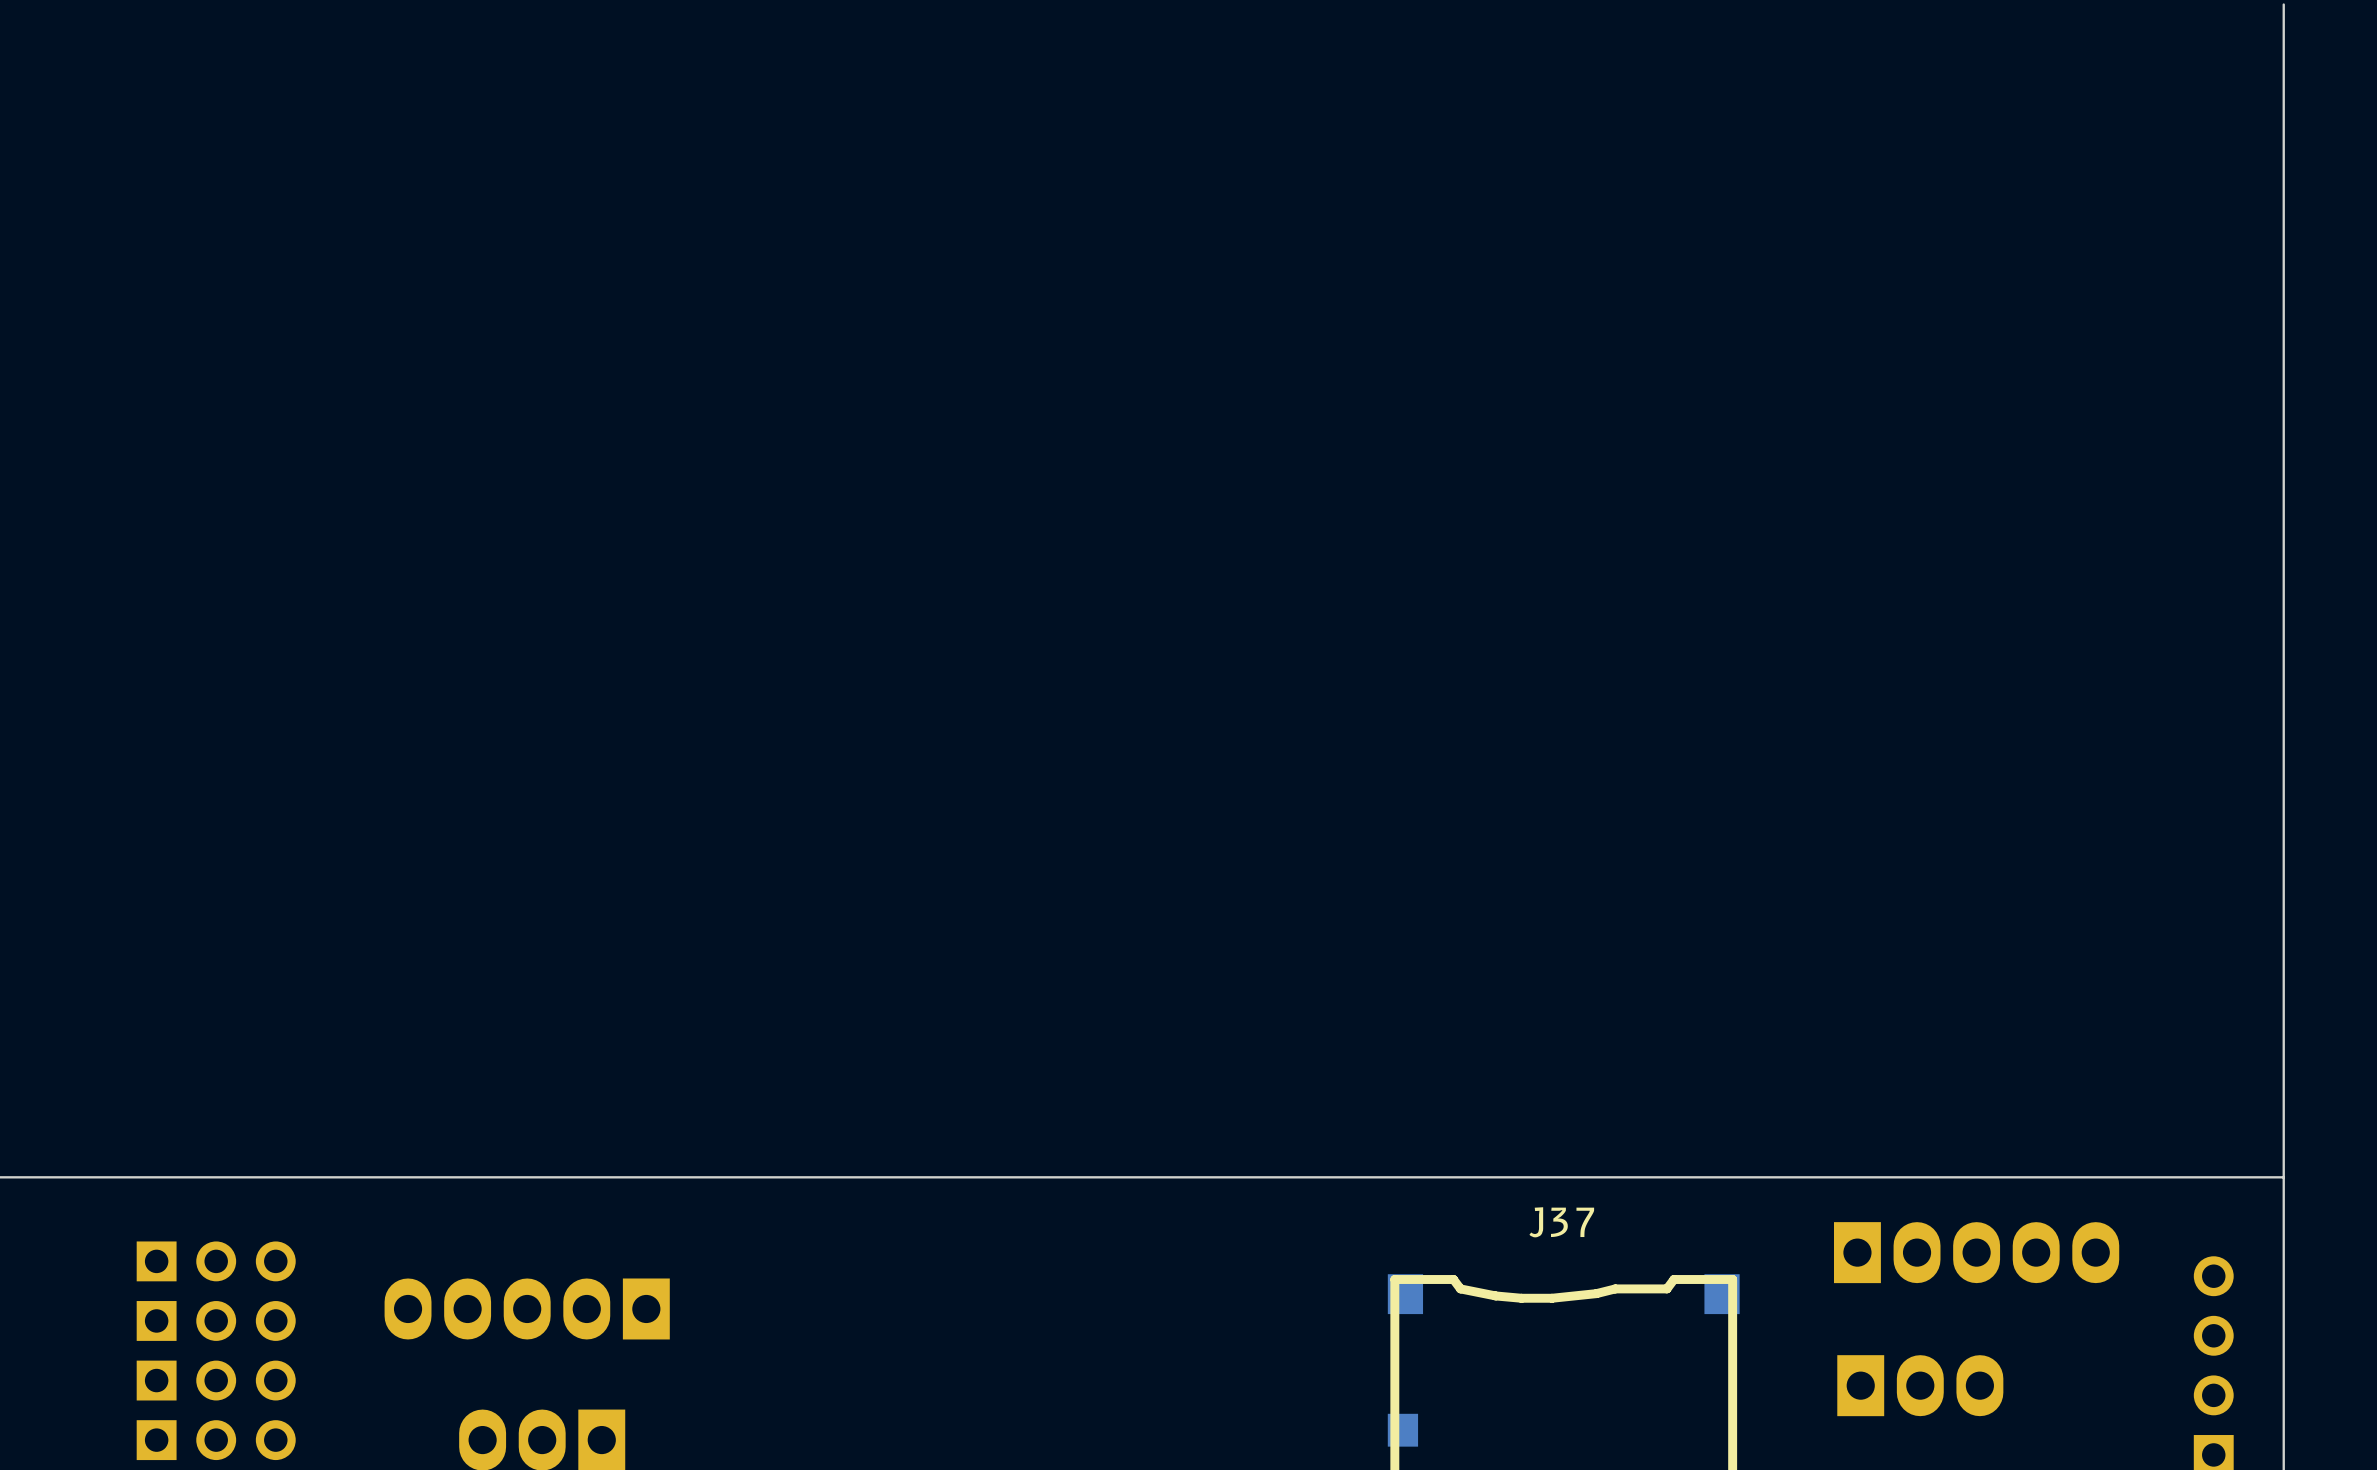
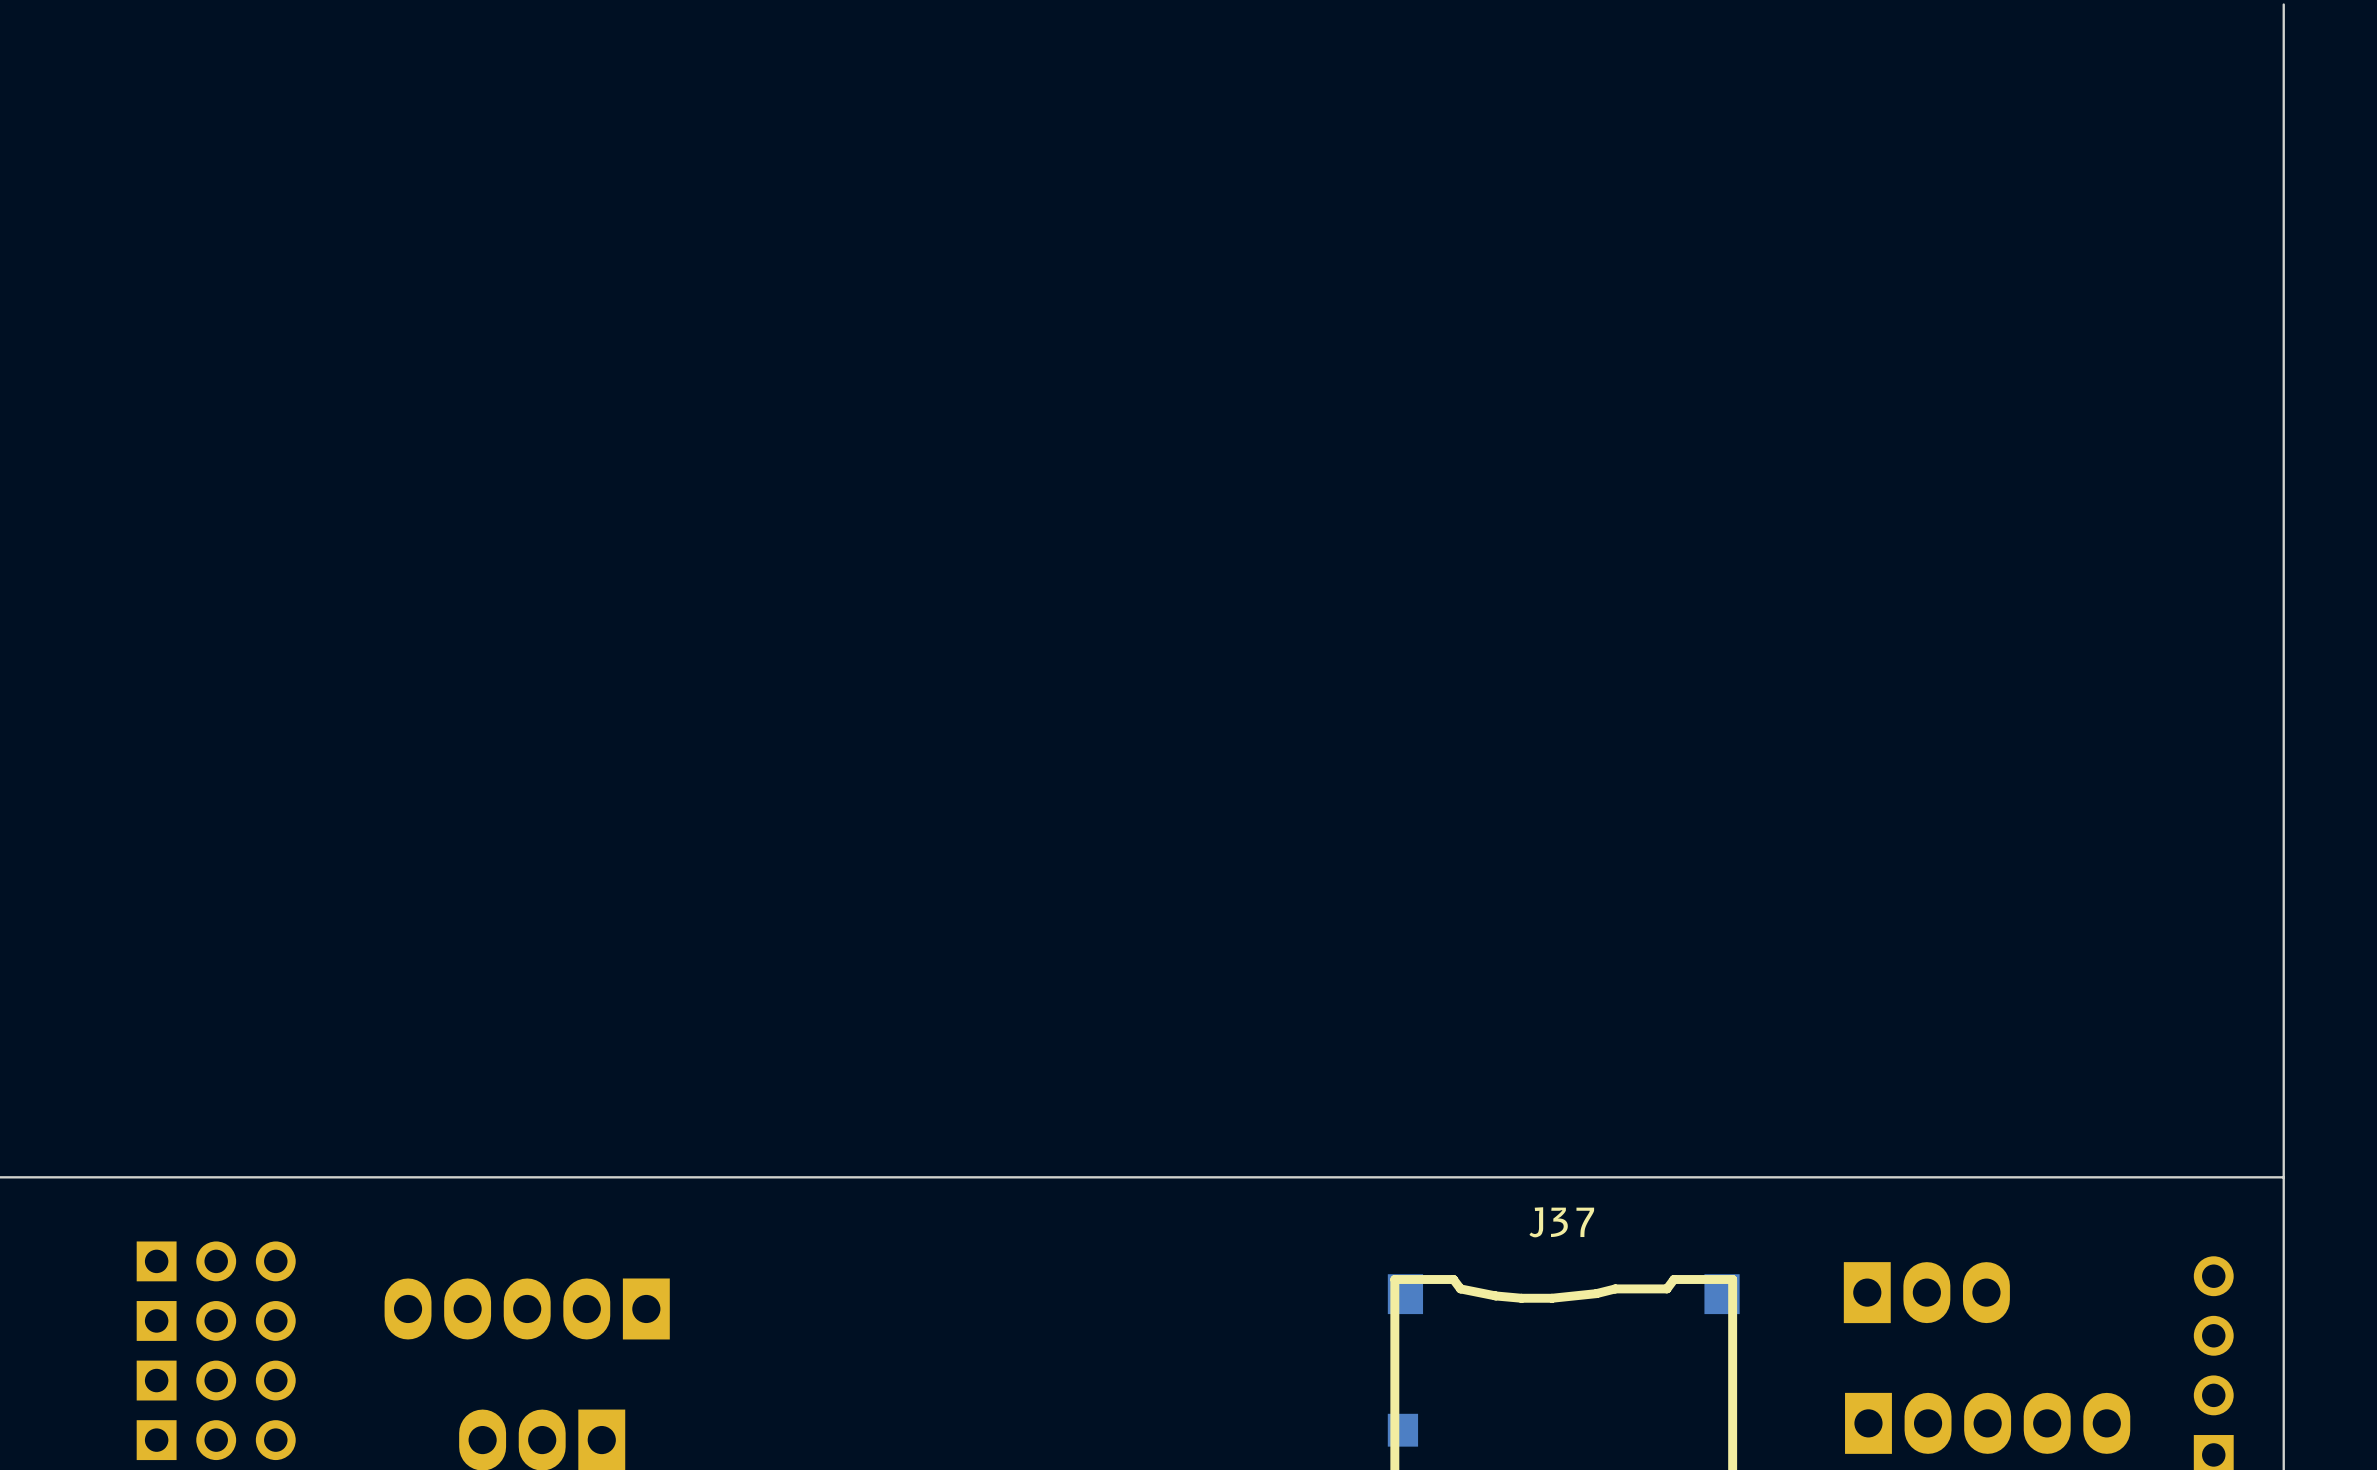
part position: (1976, 1252) -> (1987, 1423)
part position: (1920, 1385) -> (1926, 1292)

